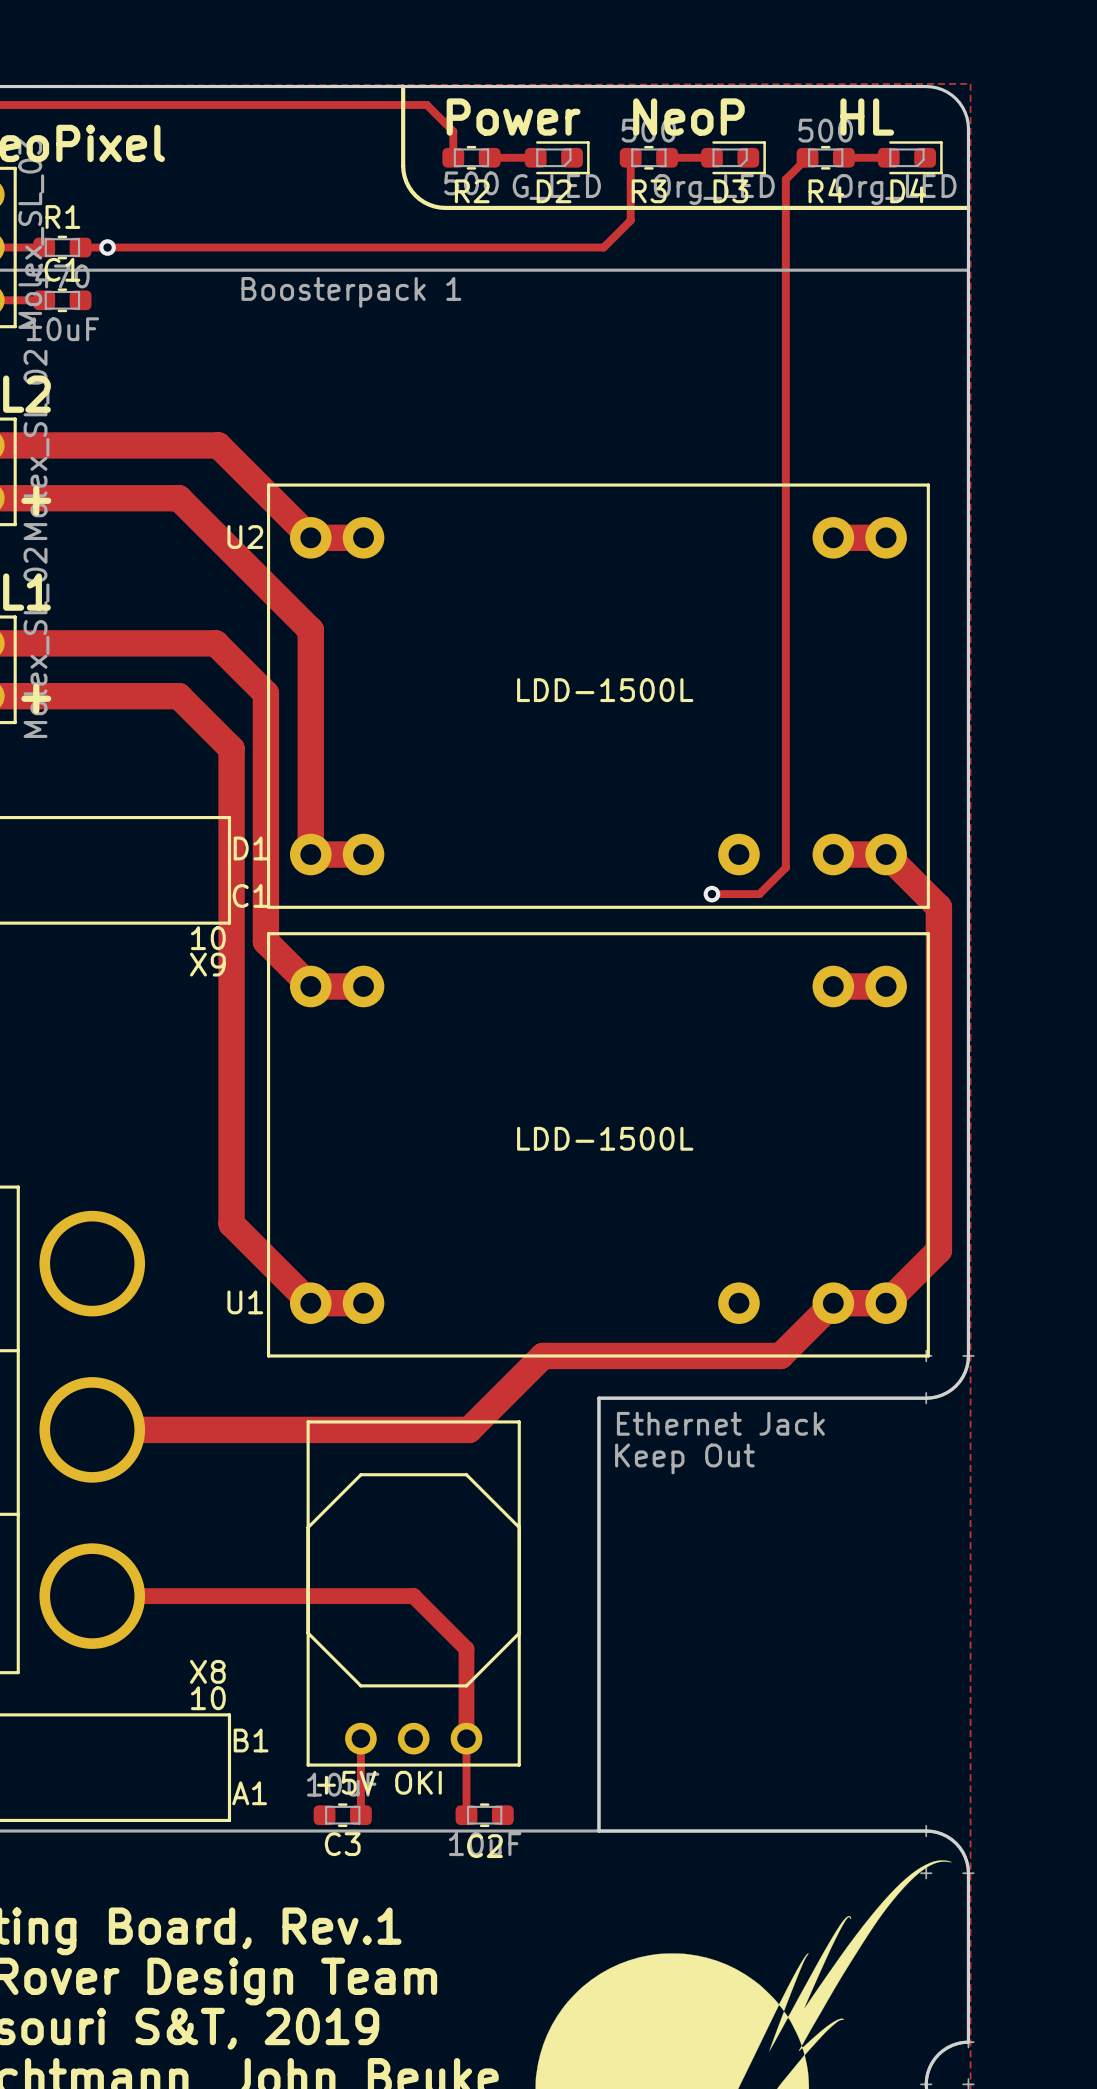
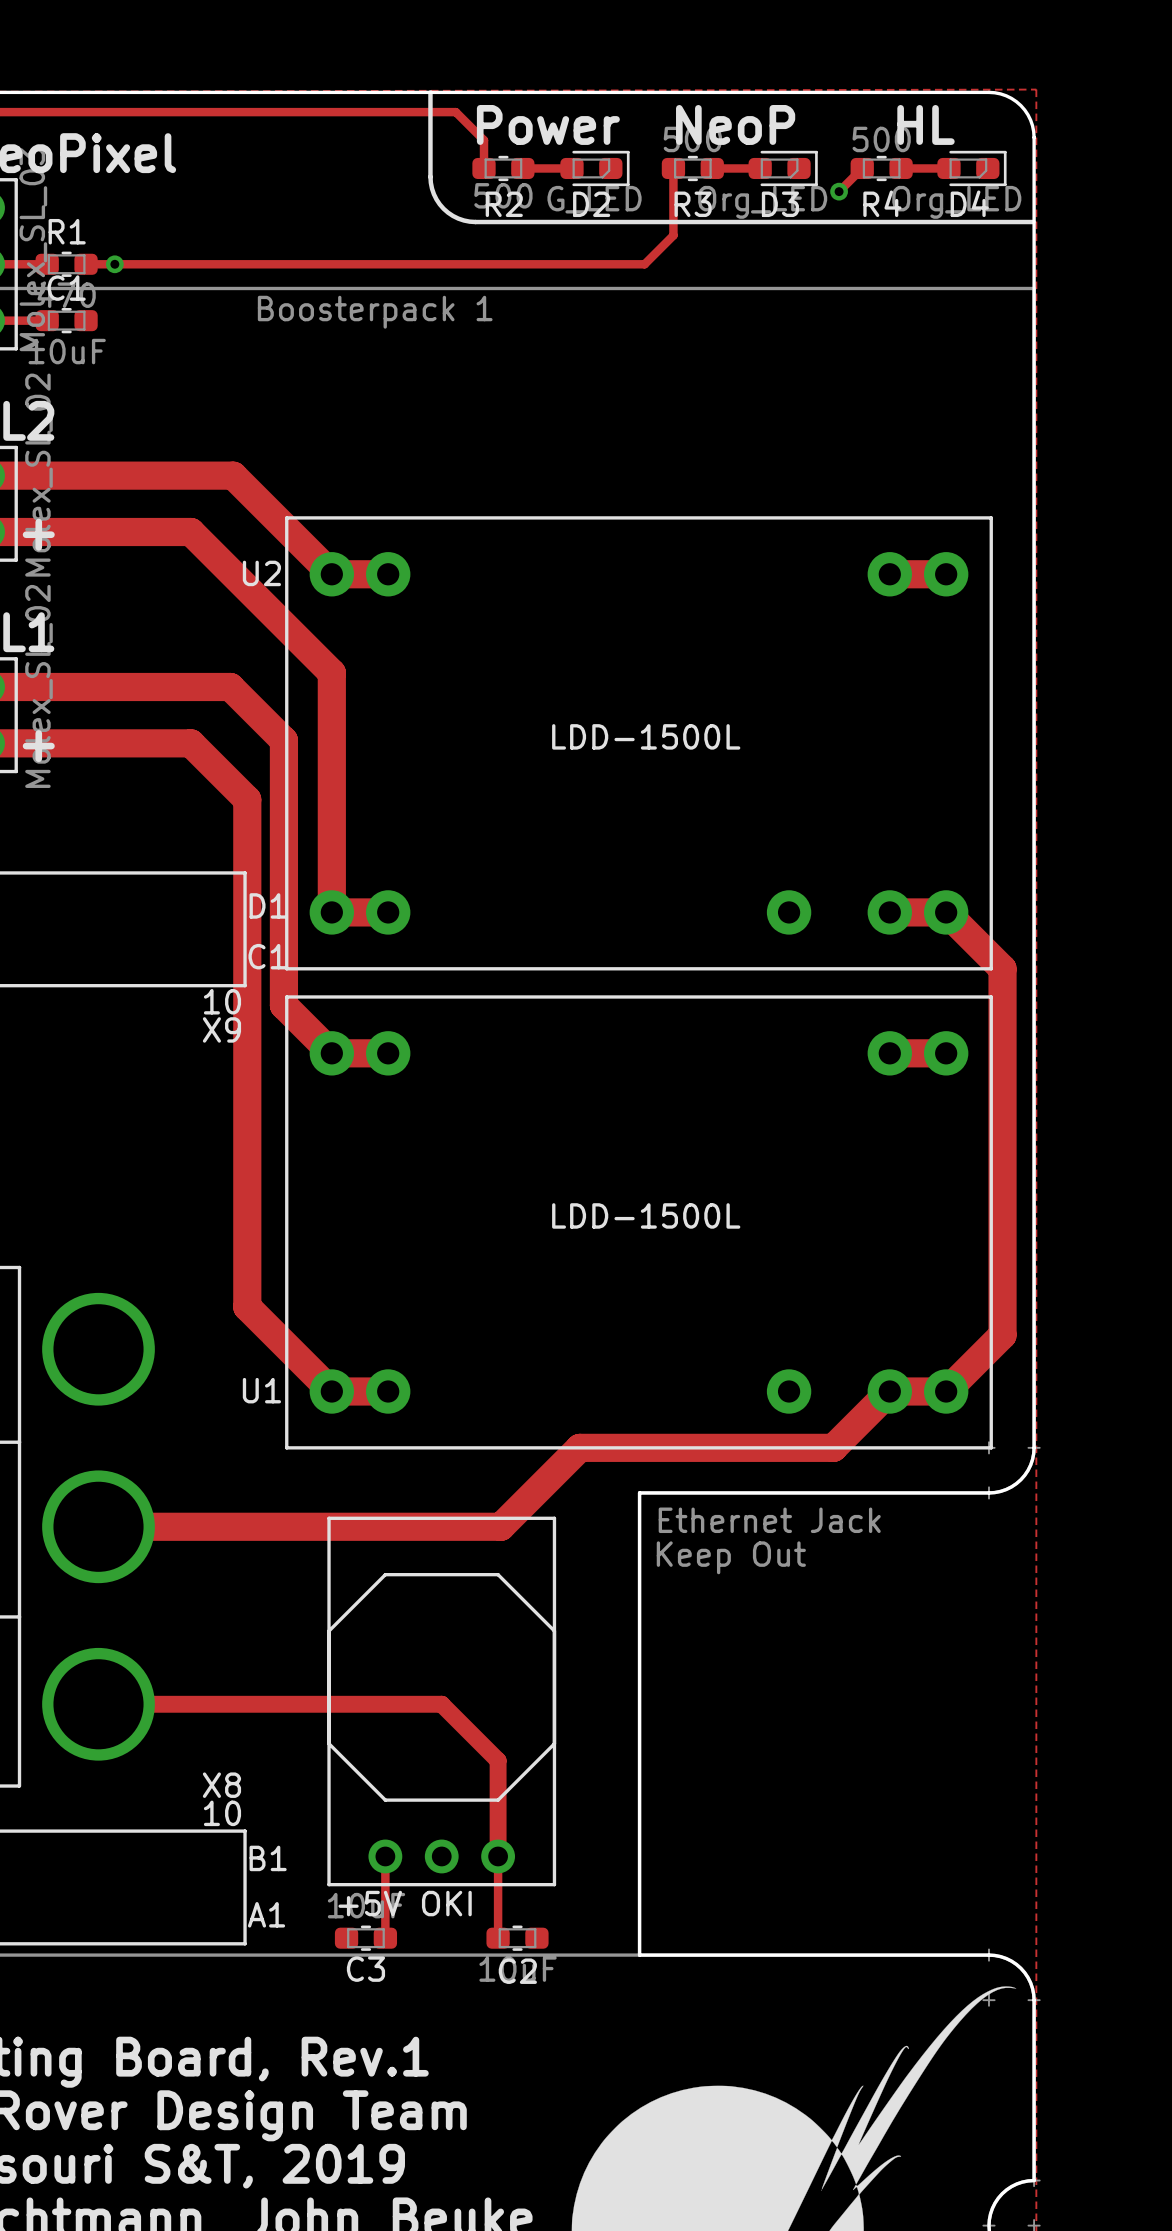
track: (785, 179) (785, 867) (759, 894) (711, 894) -> none
via: none -> (839, 191)
via: (711, 894) -> none

